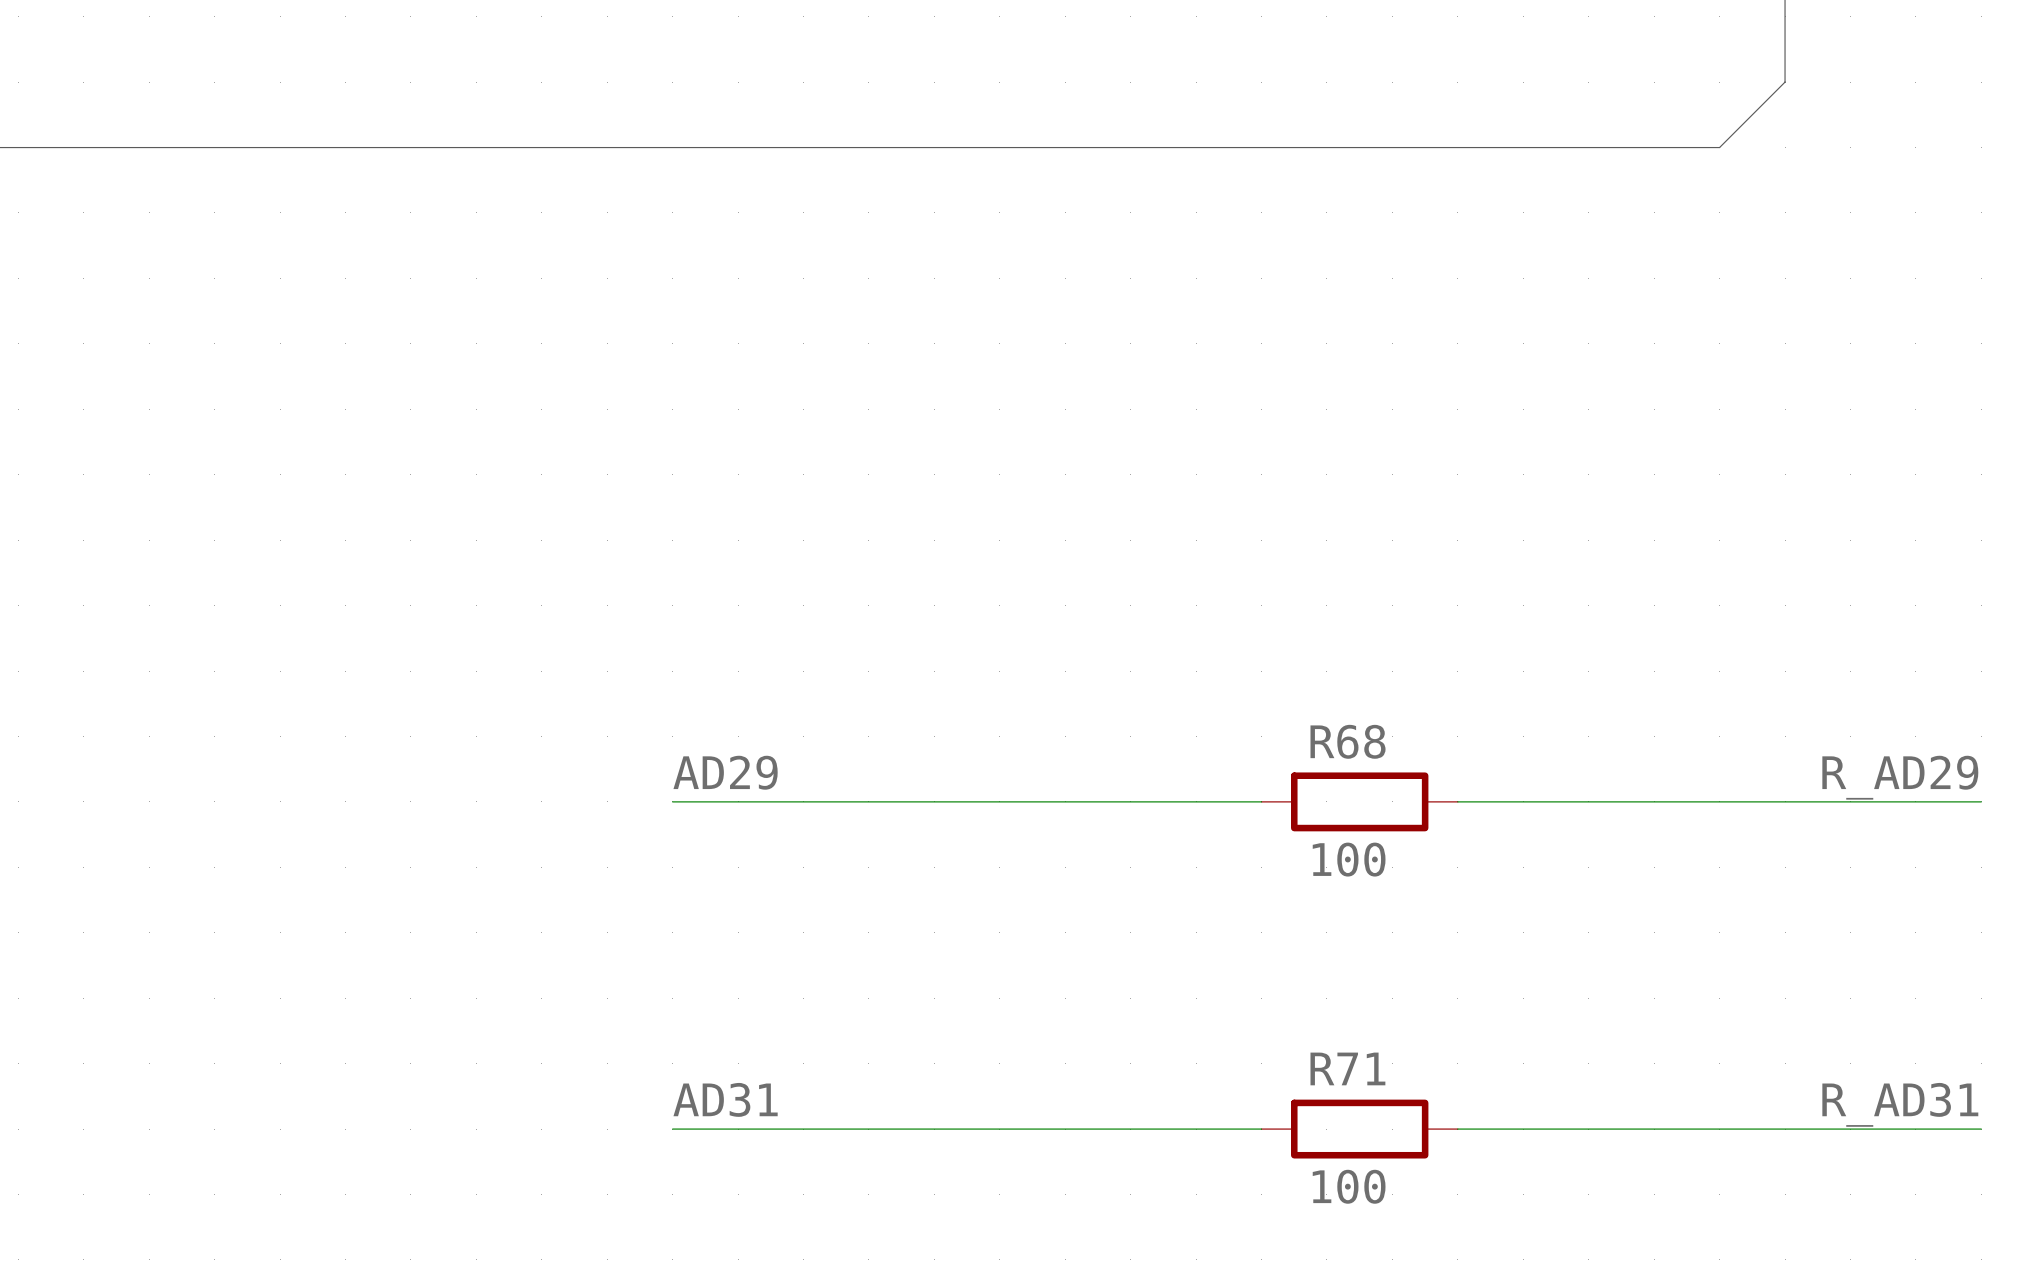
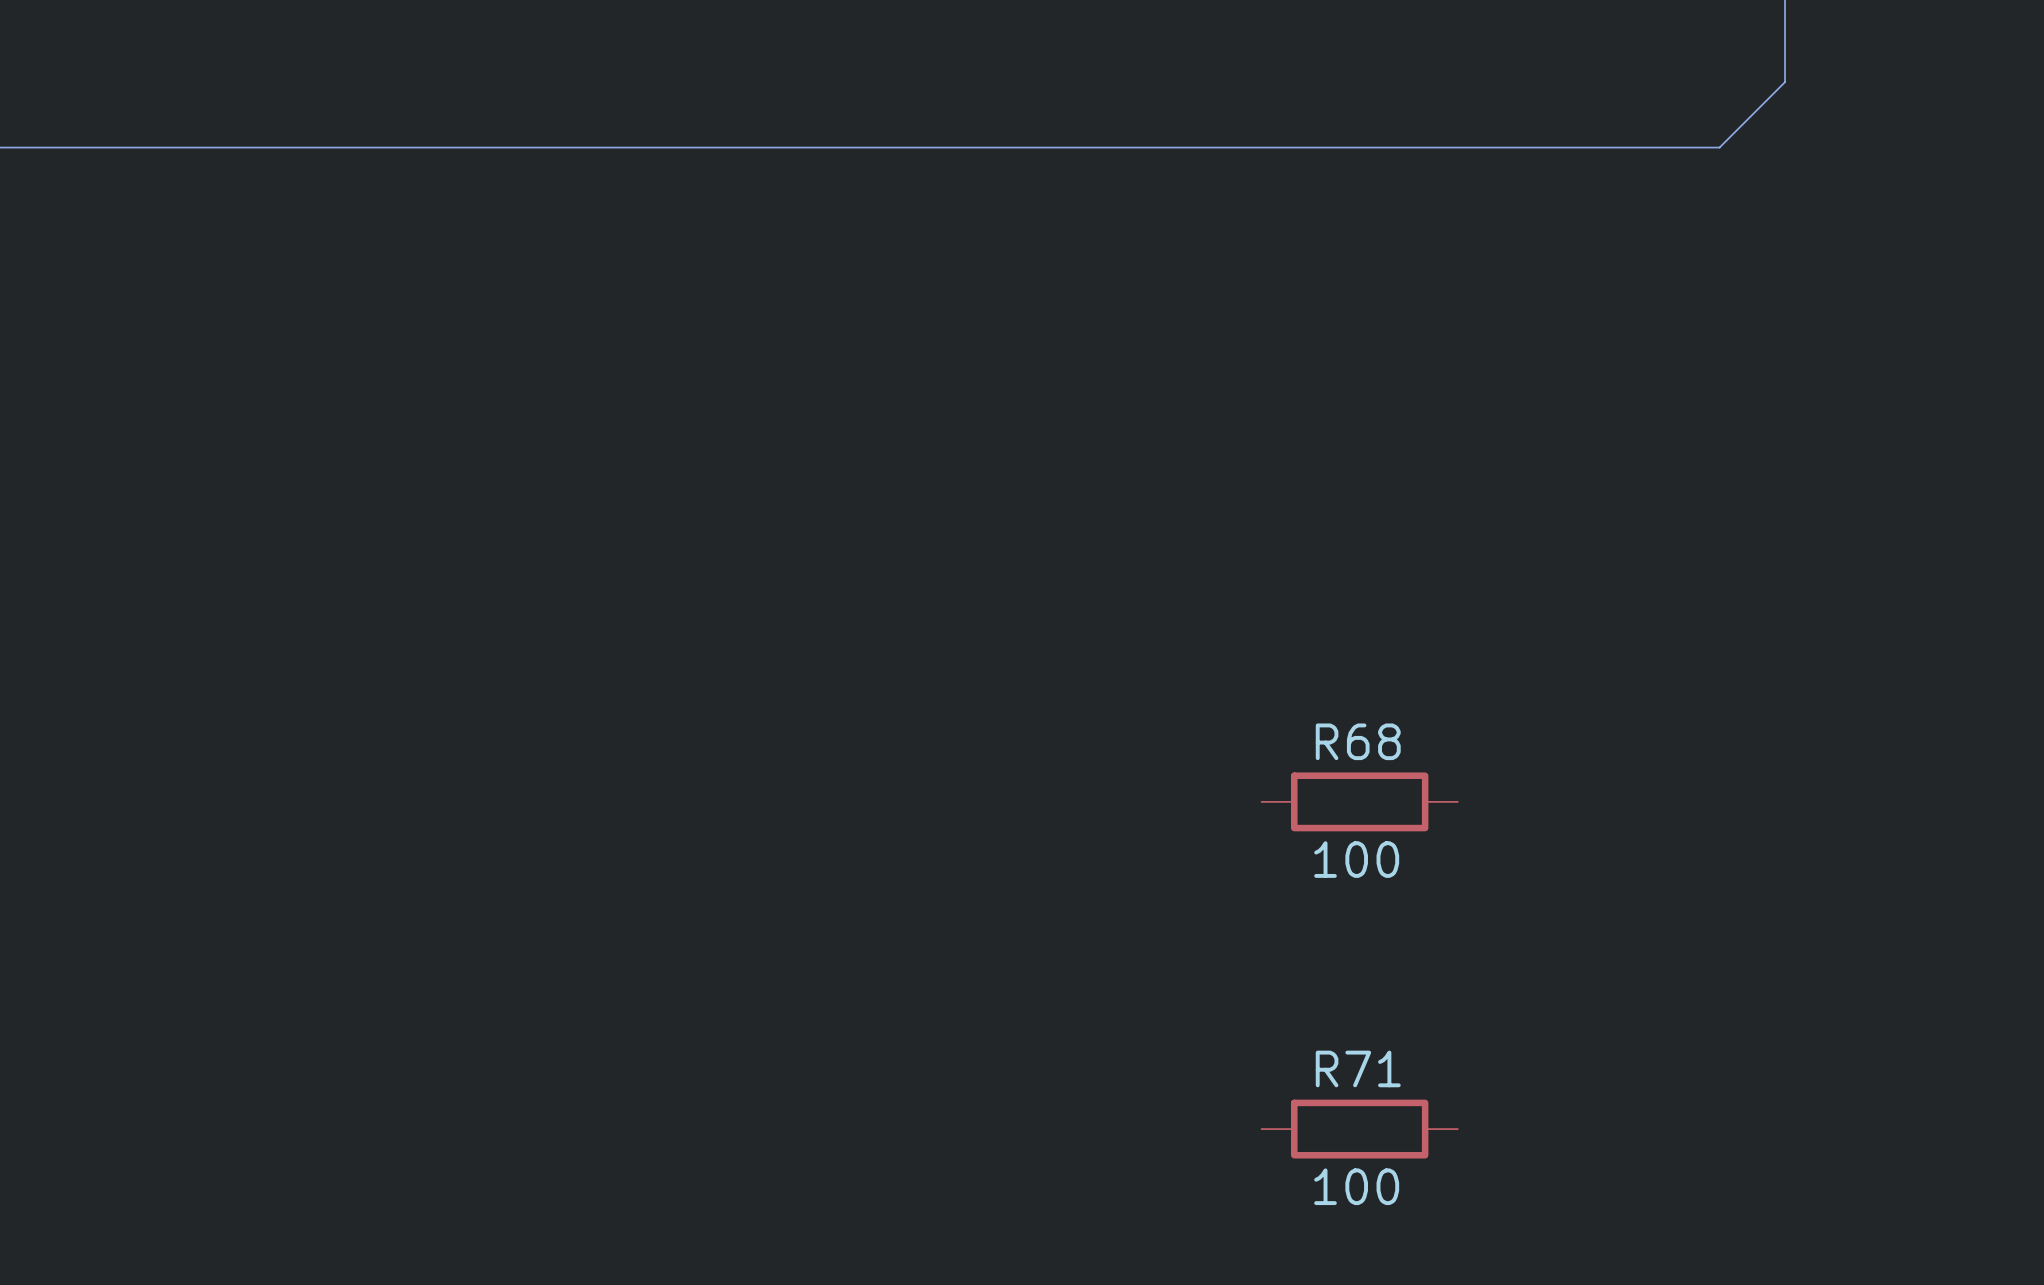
label: AD29 (725, 772) -> none
label: R_AD29 (1900, 777) -> none
wire: (672, 801) (1261, 801) -> none
wire: (1457, 801) (1981, 801) -> none
label: AD31 (725, 1099) -> none
label: R_AD31 (1900, 1104) -> none
wire: (672, 1129) (1261, 1129) -> none
wire: (1457, 1129) (1981, 1129) -> none

